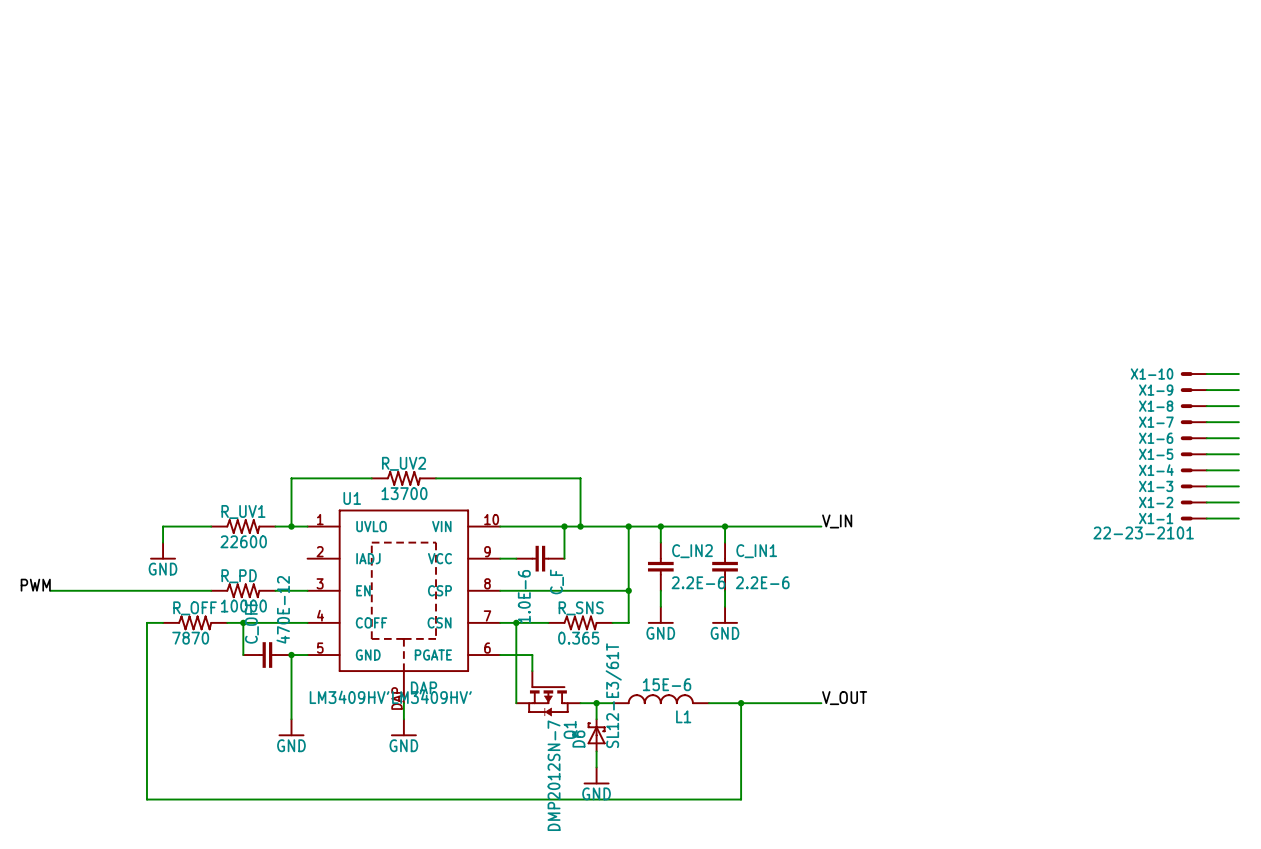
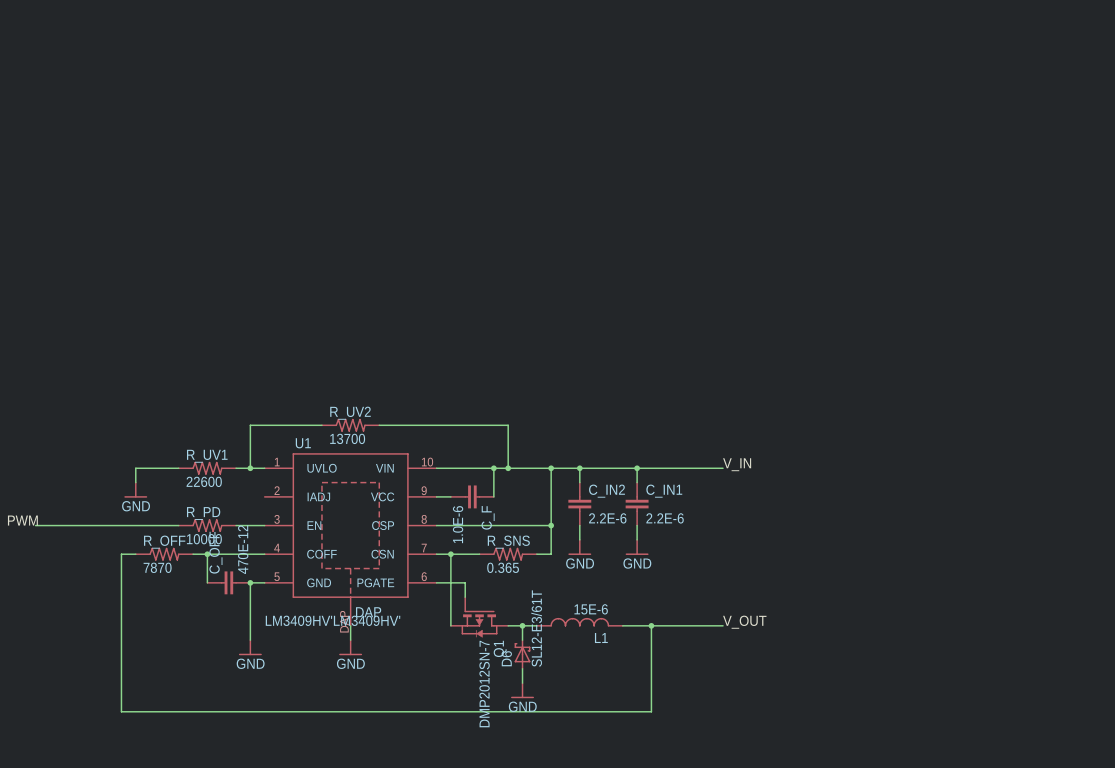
X1-10: (1193, 374) -> none
wire: (1206, 374) (1238, 374) -> none
X1-9: (1193, 390) -> none
wire: (1206, 390) (1238, 390) -> none
X1-8: (1193, 406) -> none
wire: (1206, 406) (1238, 406) -> none
X1-7: (1193, 422) -> none
wire: (1206, 422) (1238, 422) -> none
X1-6: (1193, 438) -> none
wire: (1206, 438) (1238, 438) -> none
X1-5: (1193, 454) -> none
wire: (1206, 454) (1238, 454) -> none
X1-4: (1193, 470) -> none
wire: (1206, 470) (1238, 470) -> none
X1-3: (1193, 486) -> none
wire: (1206, 486) (1238, 486) -> none
X1-2: (1193, 502) -> none
wire: (1206, 502) (1238, 502) -> none
X1-1: 22-23-2101 (1193, 518) -> none
wire: (1206, 518) (1238, 518) -> none

